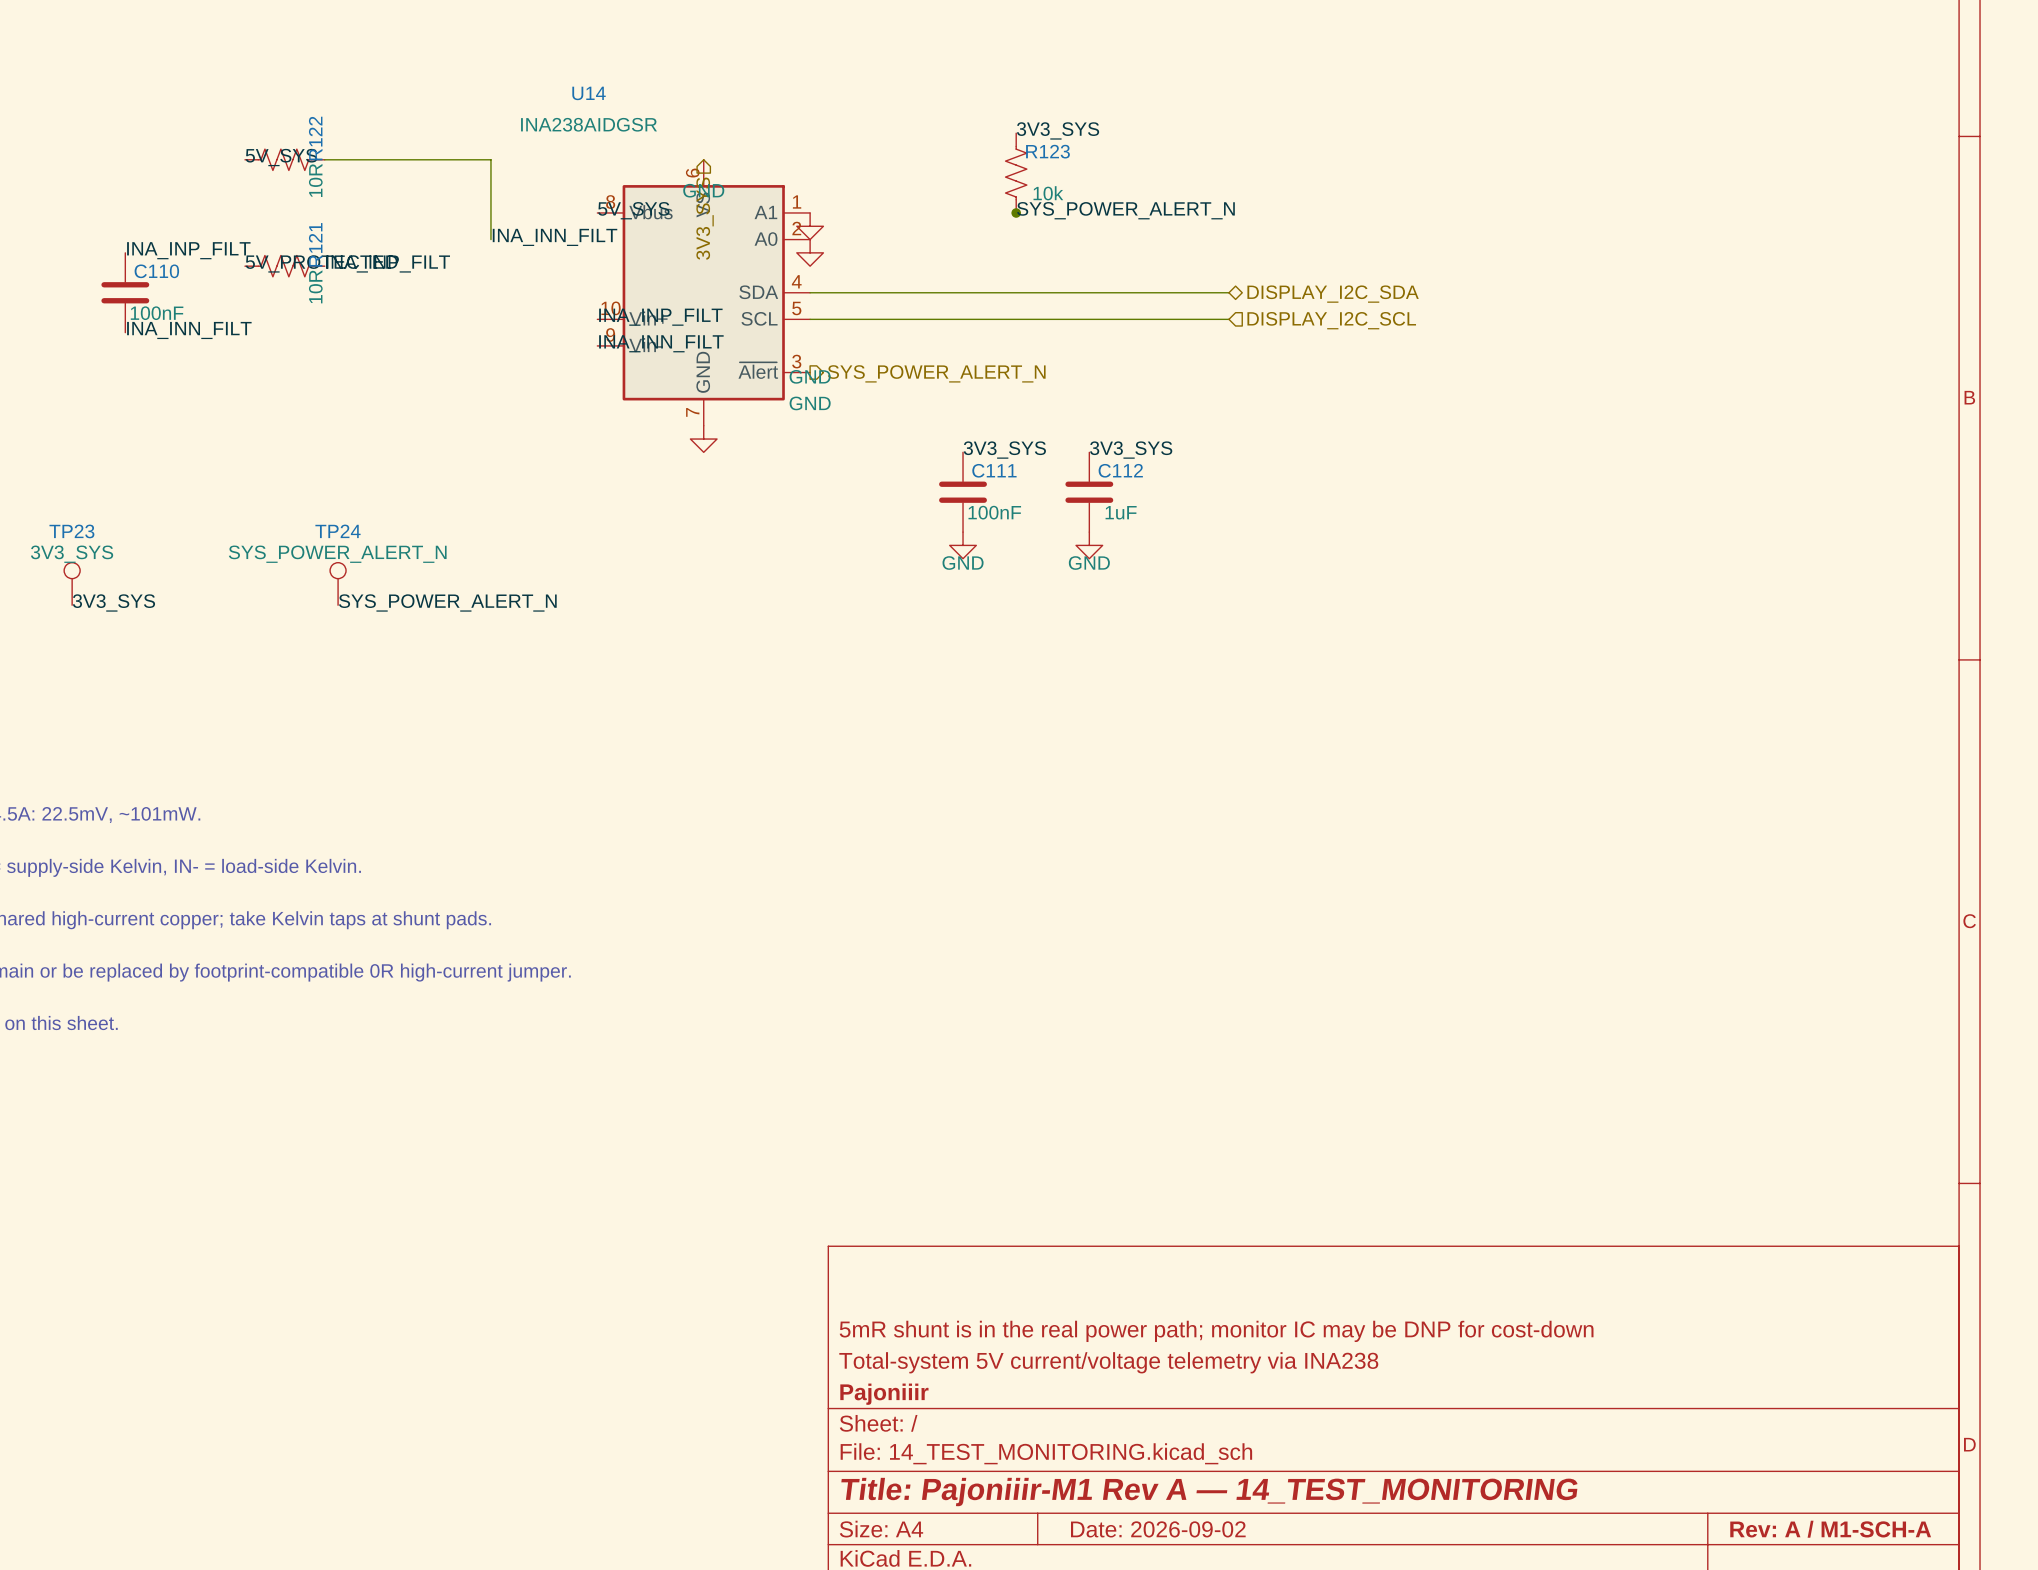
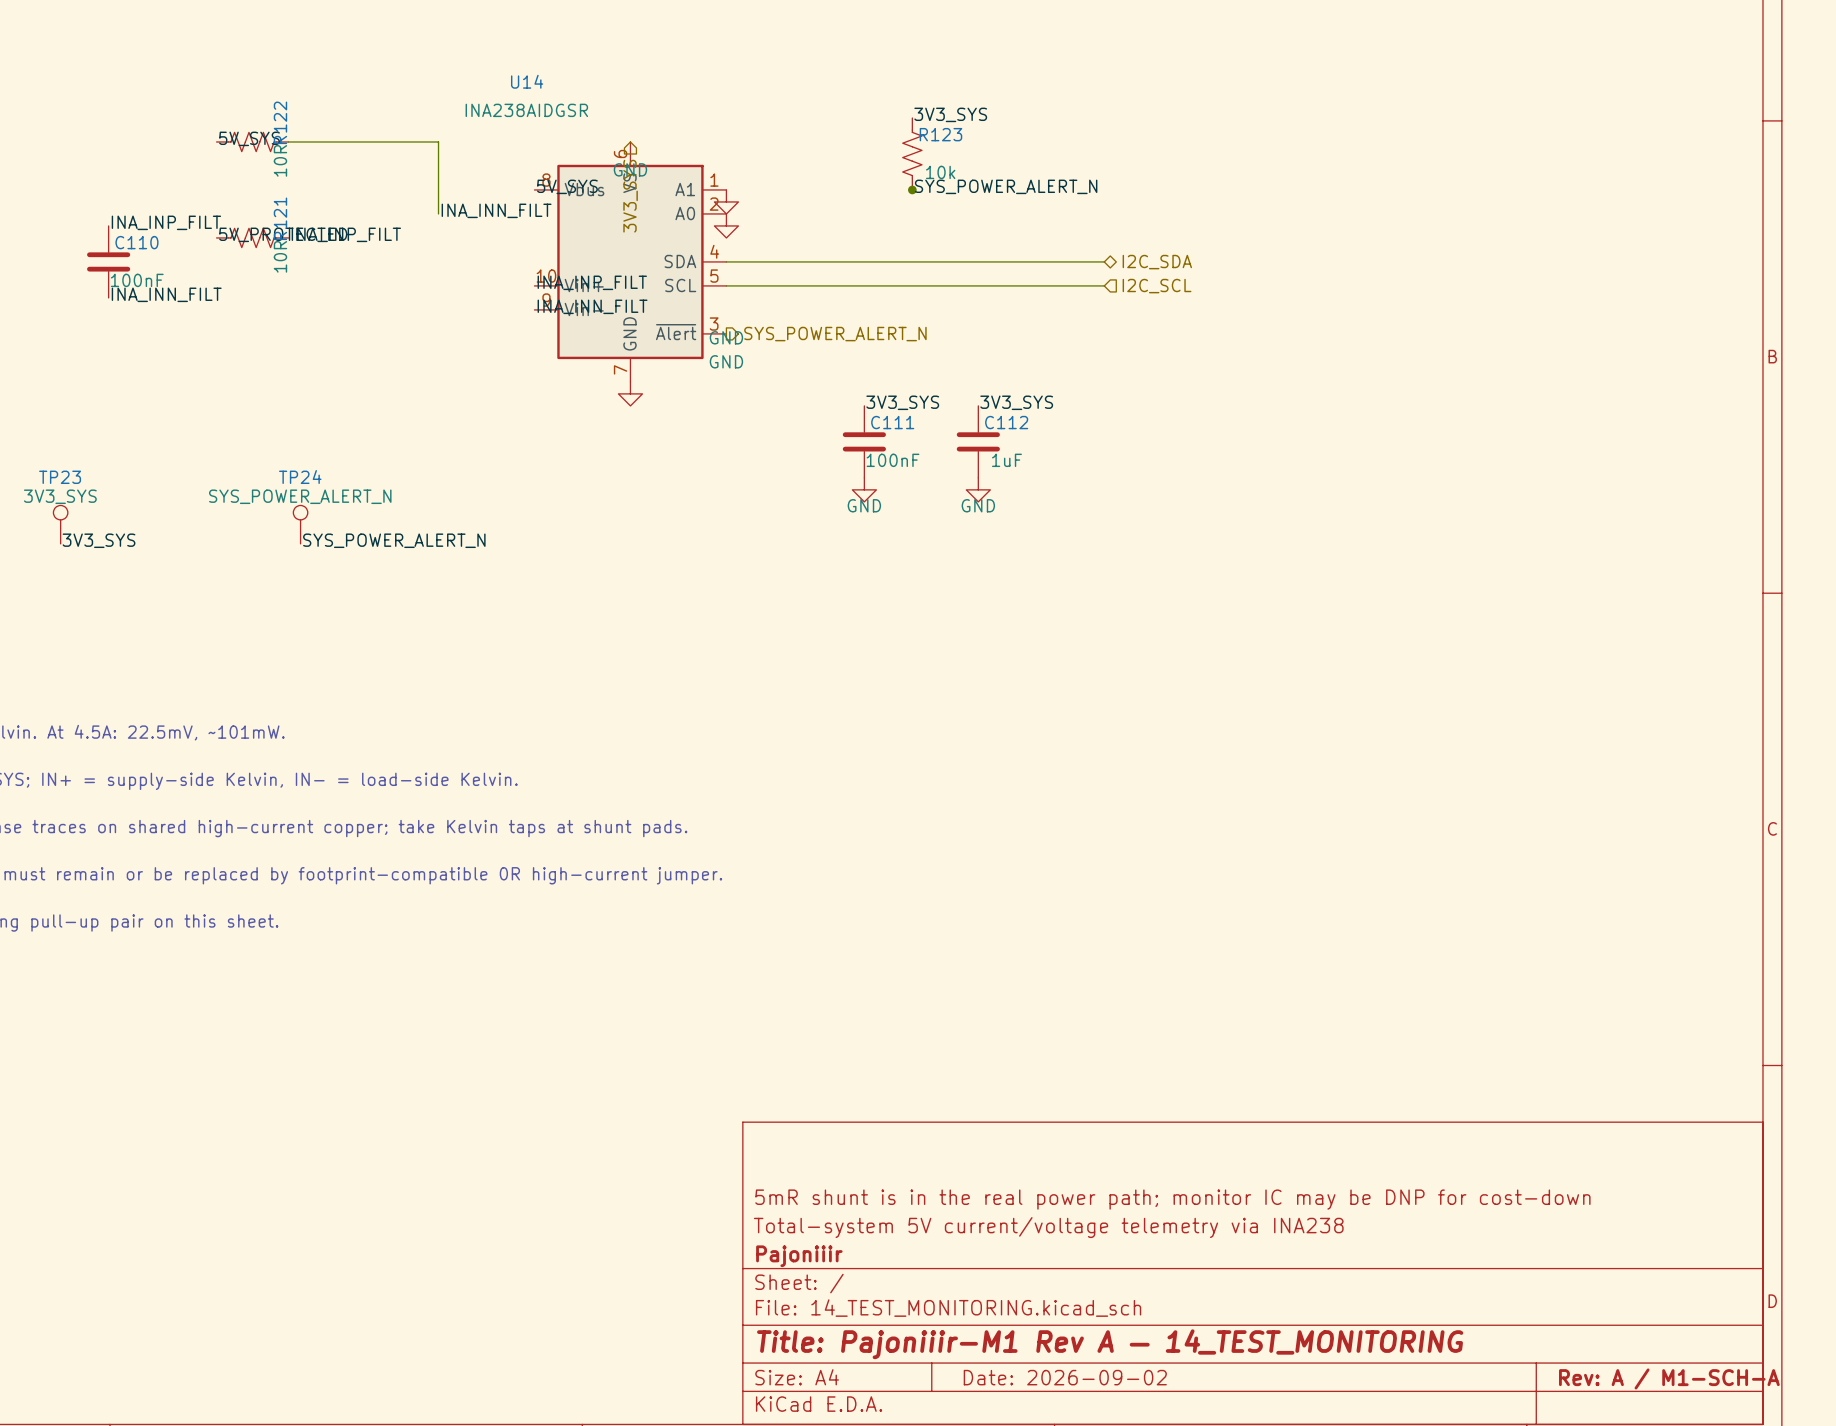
hierarchical label: DISPLAY_I2C_SDA (1333, 294) -> I2C_SDA (1157, 262)
hierarchical label: DISPLAY_I2C_SCL (1331, 320) -> I2C_SCL (1157, 286)

